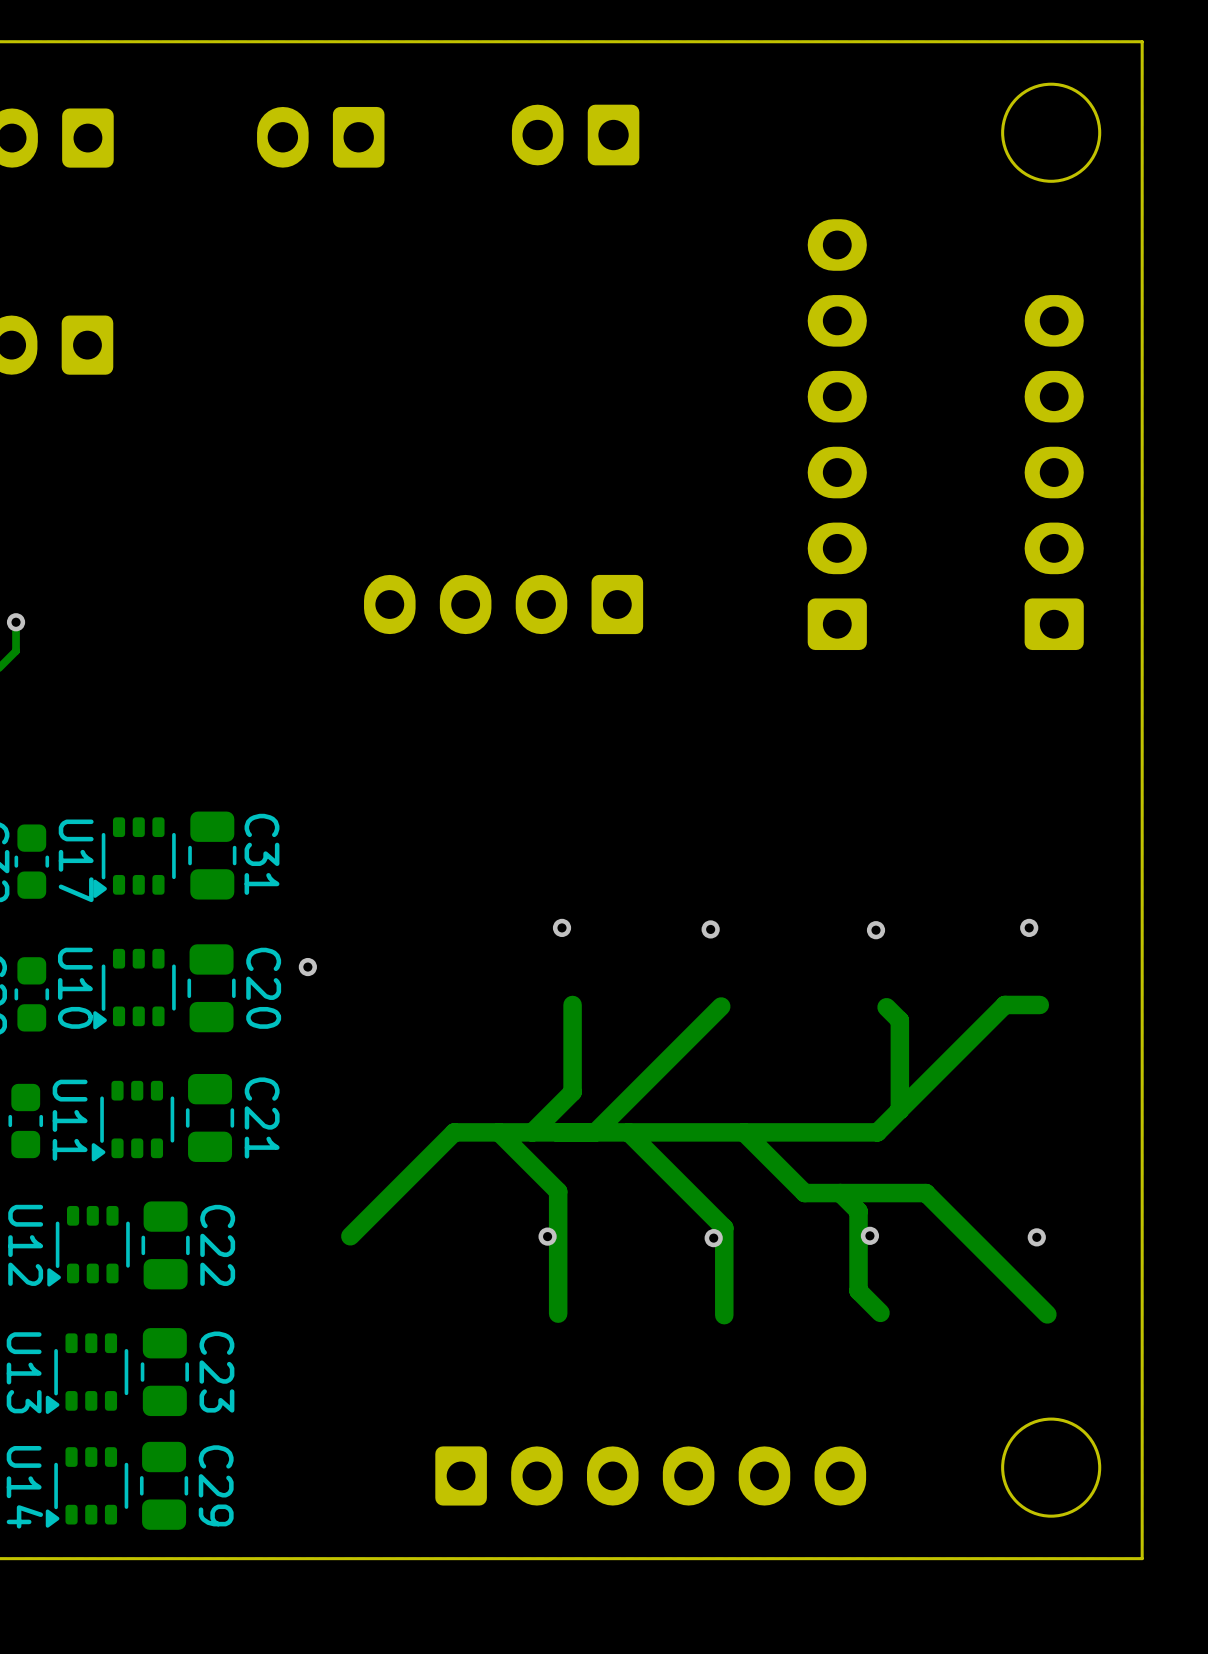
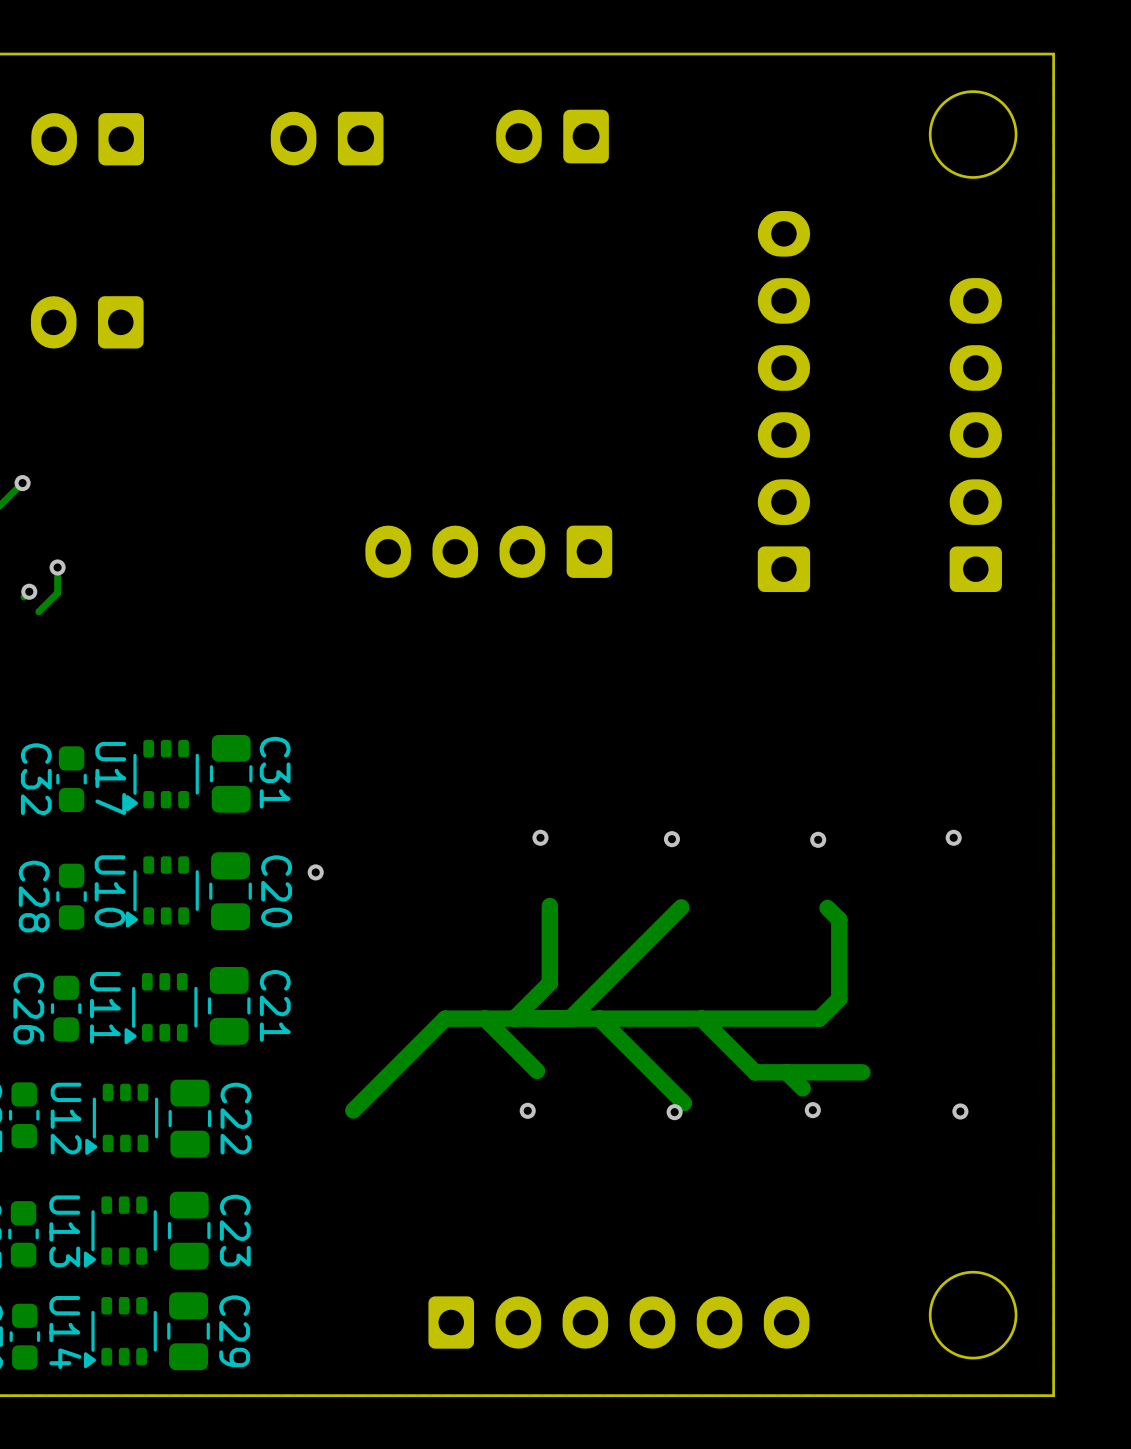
track: (1039, 1004) (1004, 1004) (899, 1110) -> none
track: (558, 1191) (558, 1313) -> none
track: (926, 1193) (1047, 1314) -> none
track: (858, 1211) (858, 1290) (880, 1312) -> none
track: (724, 1227) (724, 1315) -> none

